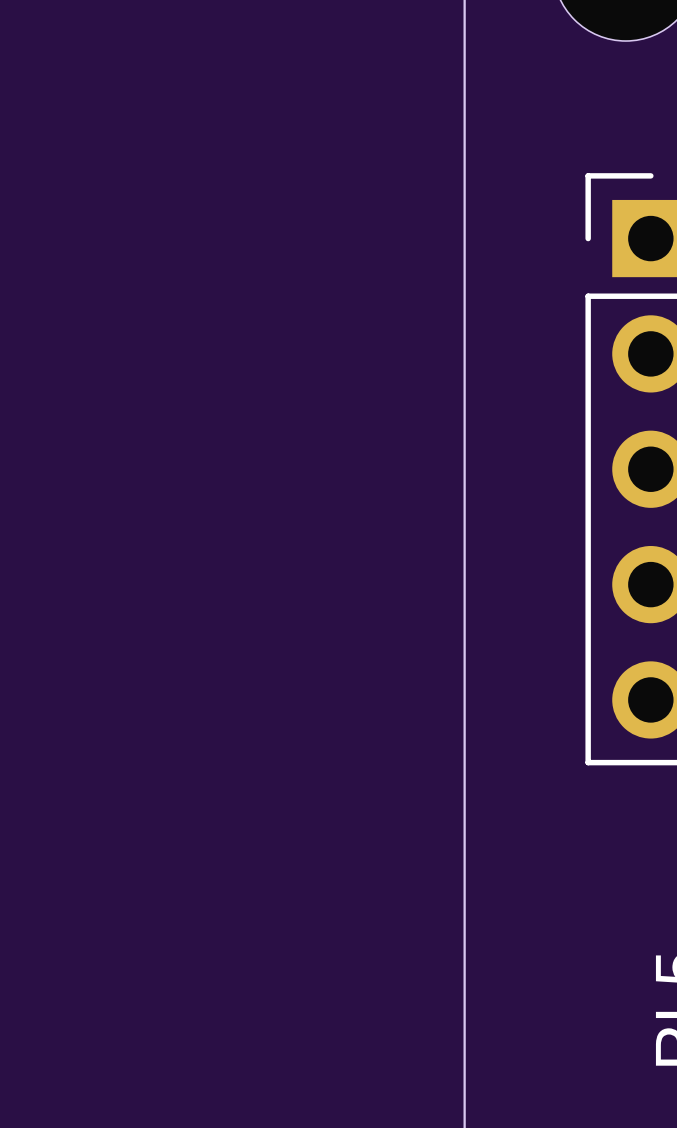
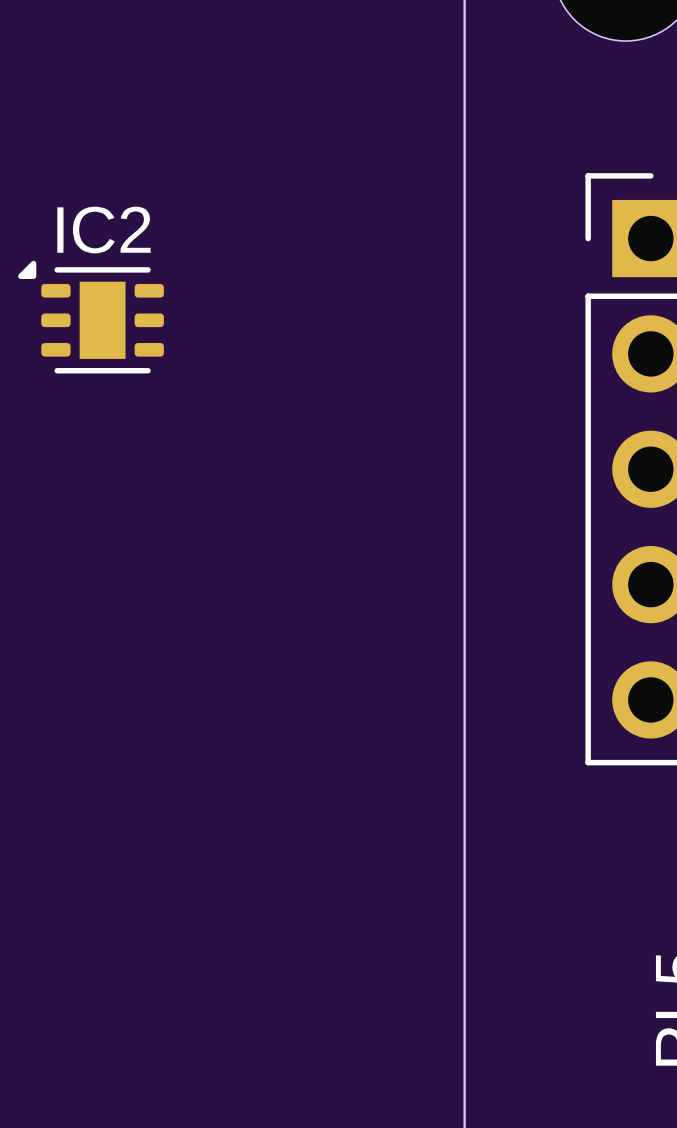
IC2: none -> (91, 317)

